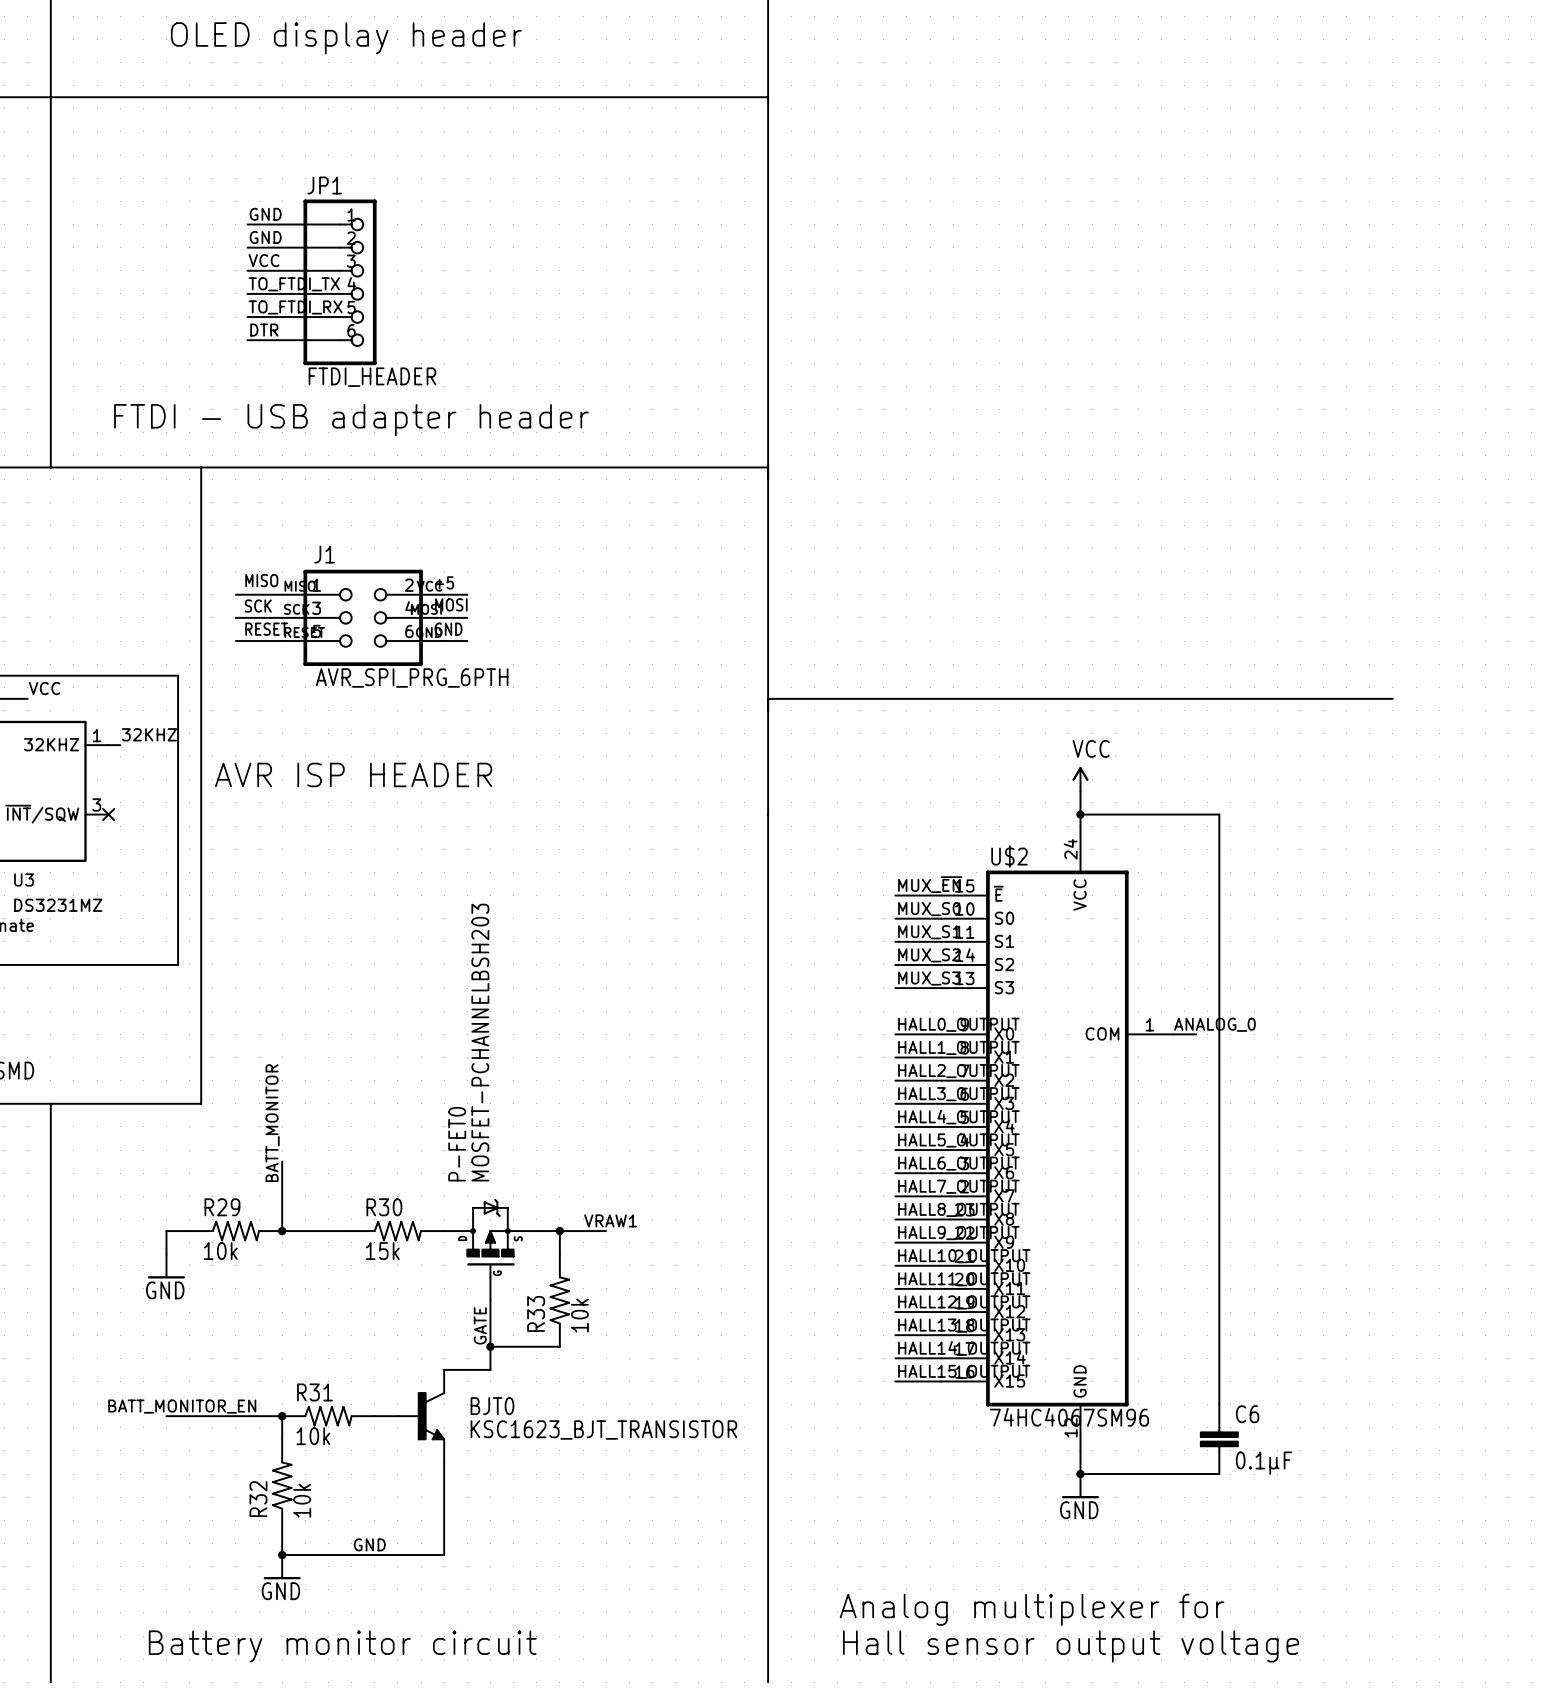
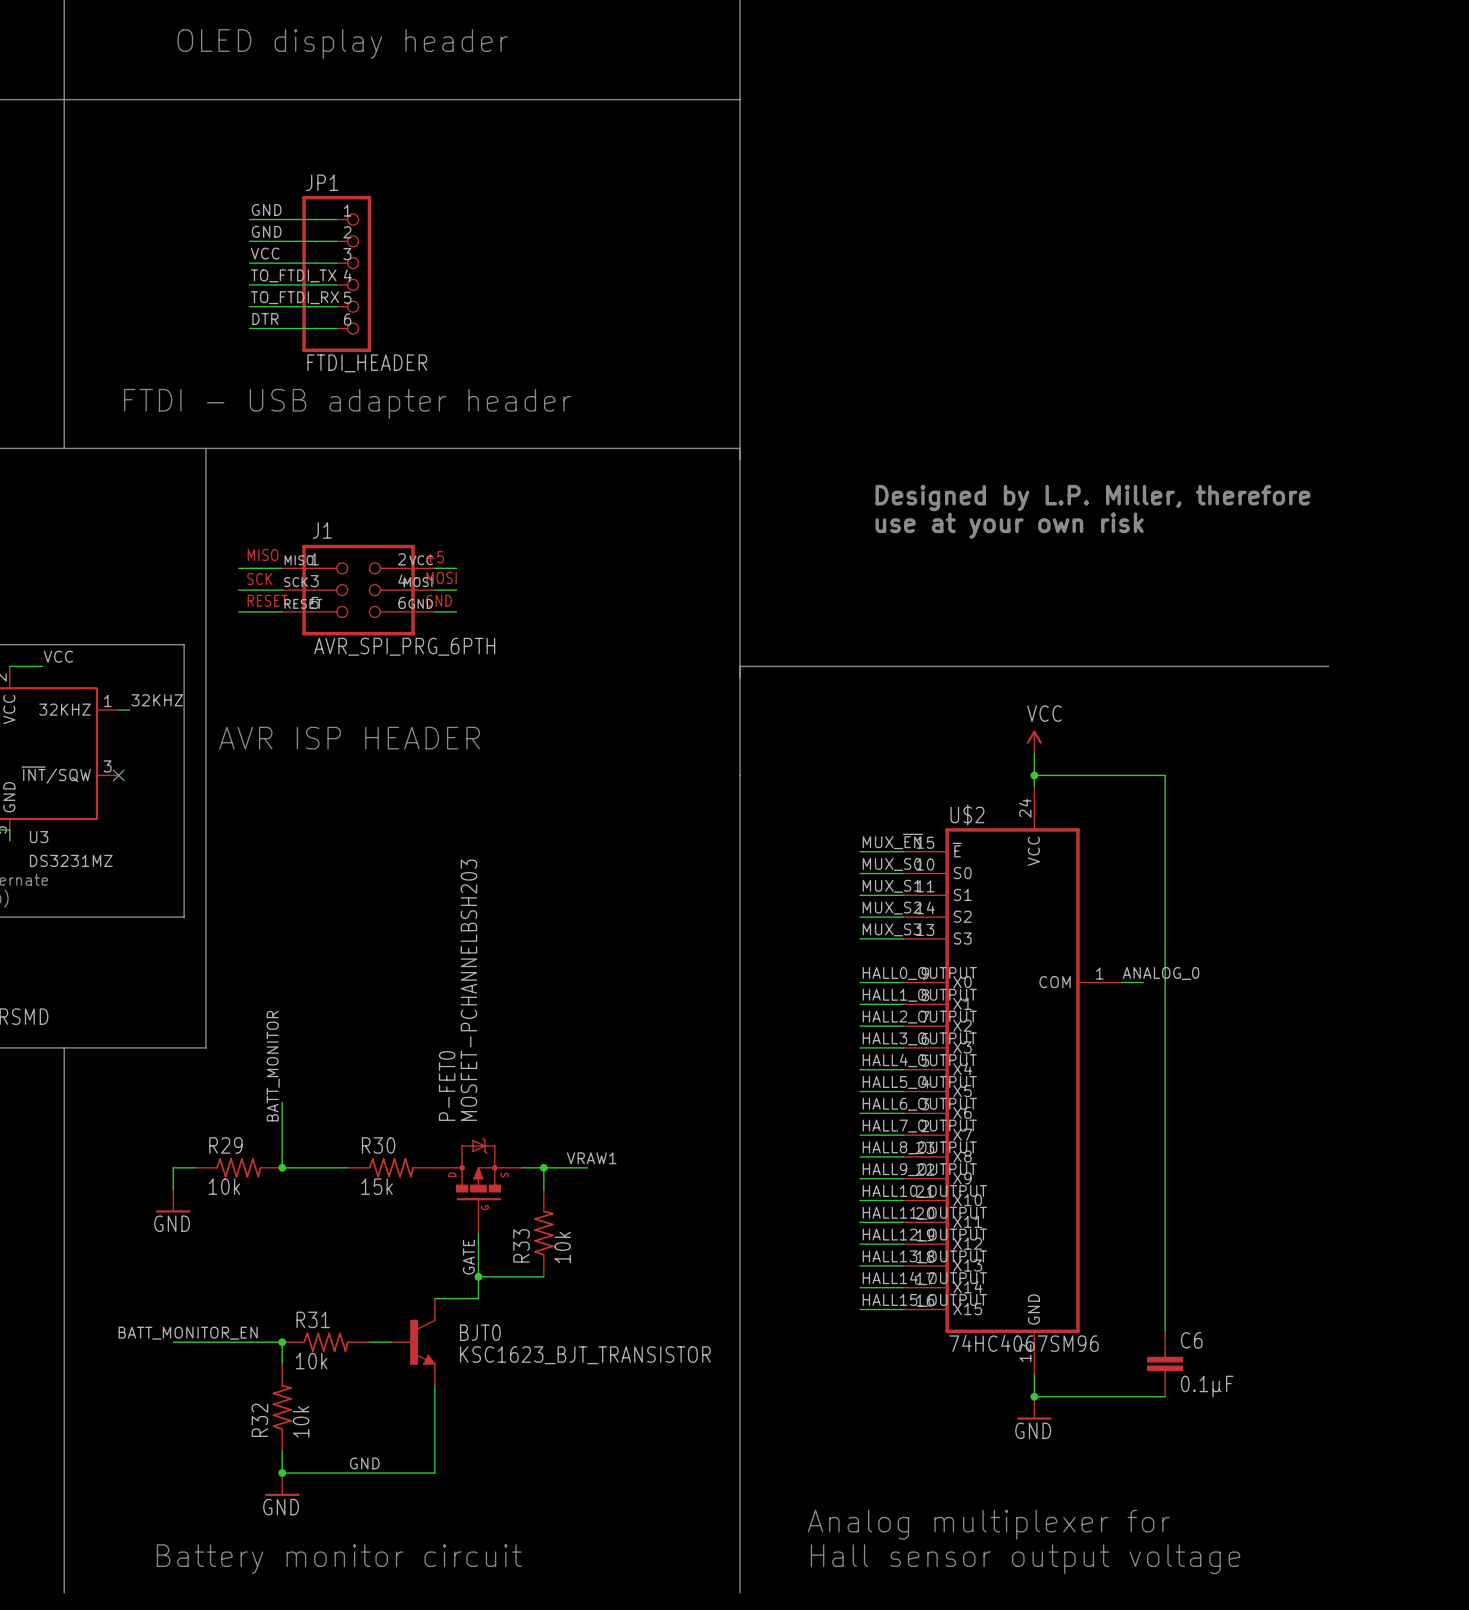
text: none -> Designed by L.P. Miller, therefore (1092, 498)
text: none -> use at your own risk (1009, 525)

